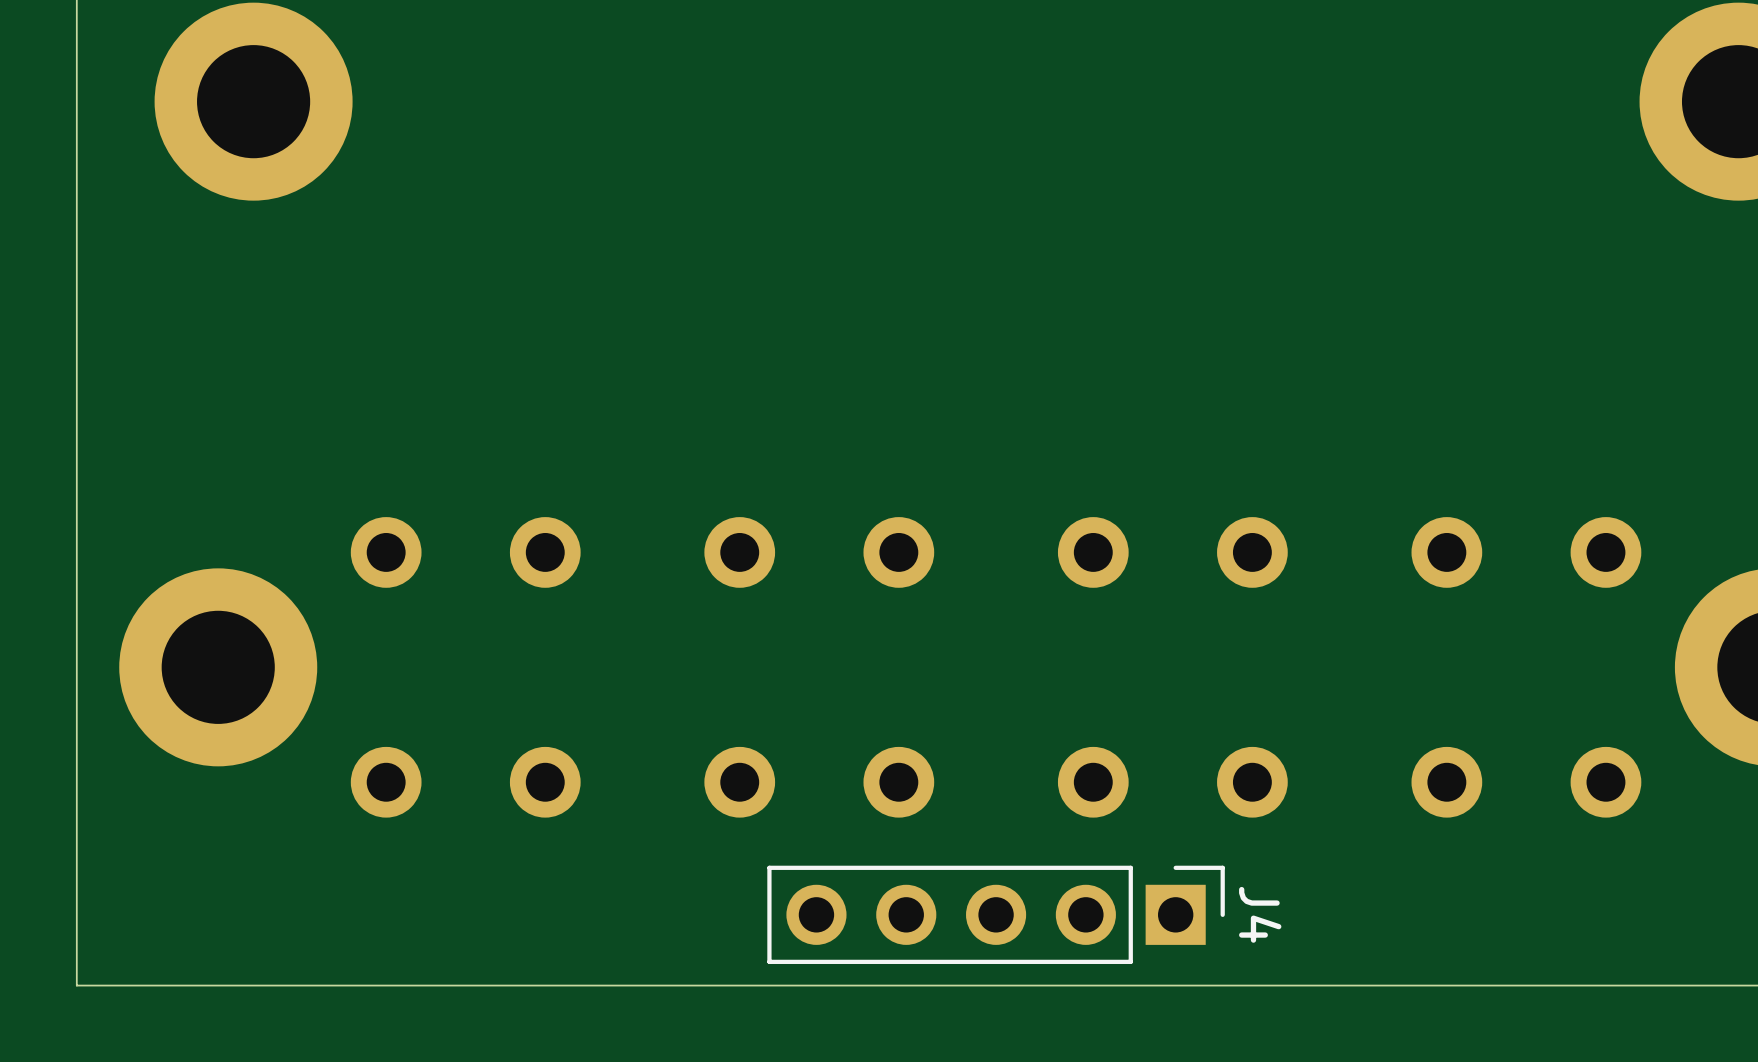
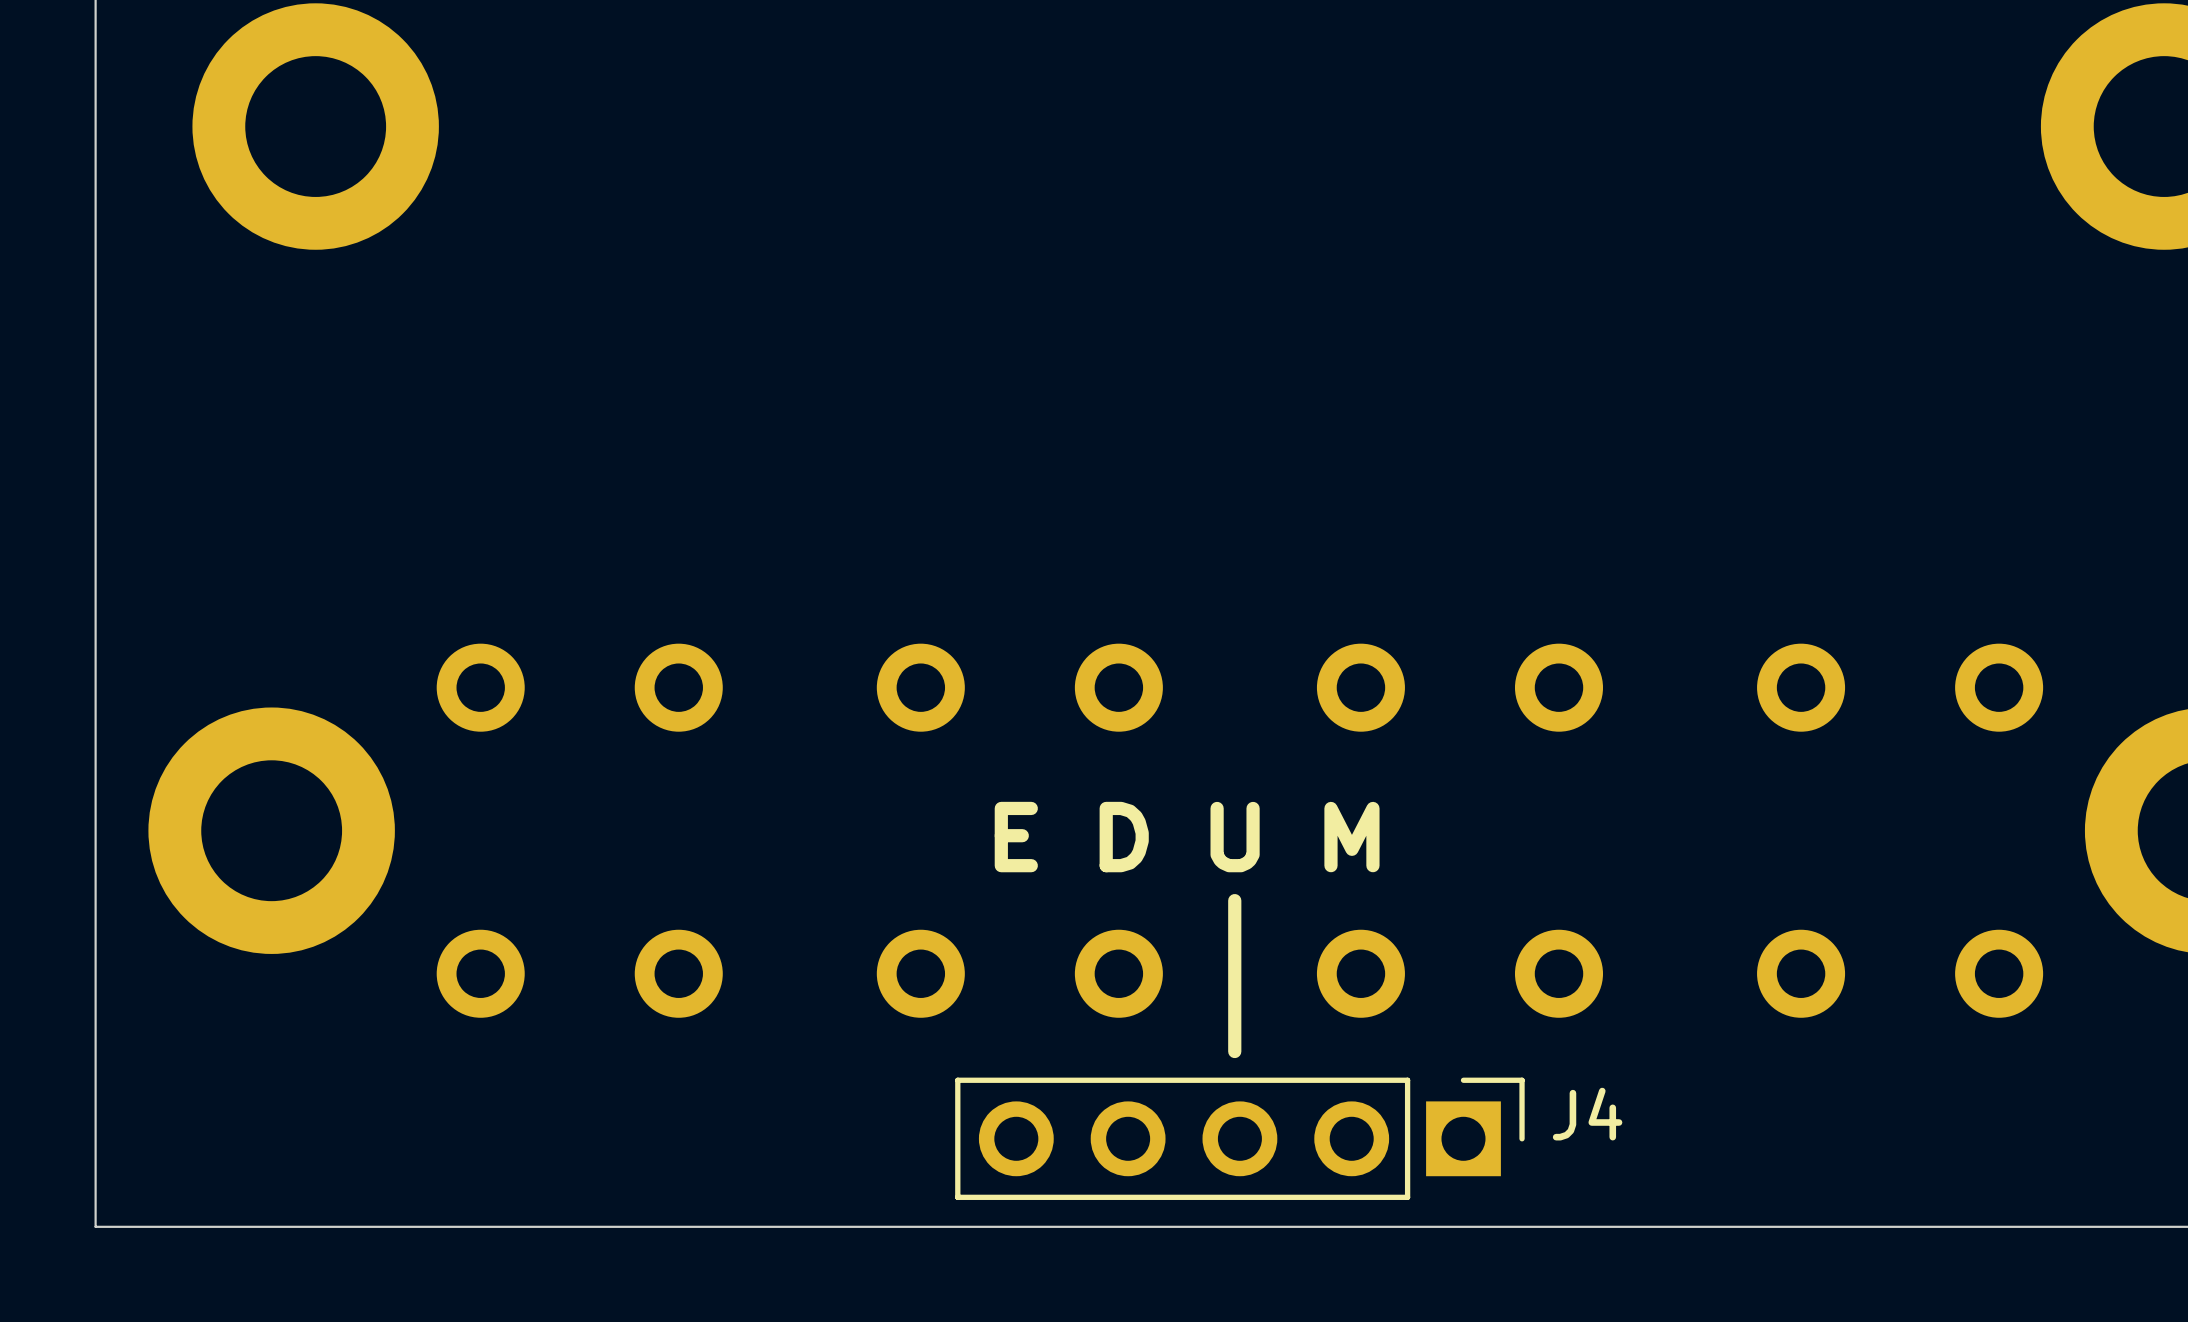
text: none -> E D U M (1187, 837)
line: none -> (1234, 900) (1234, 1051)
J4 name rotation: 0° (1260, 914) -> 90° counterclockwise (1587, 1114)

